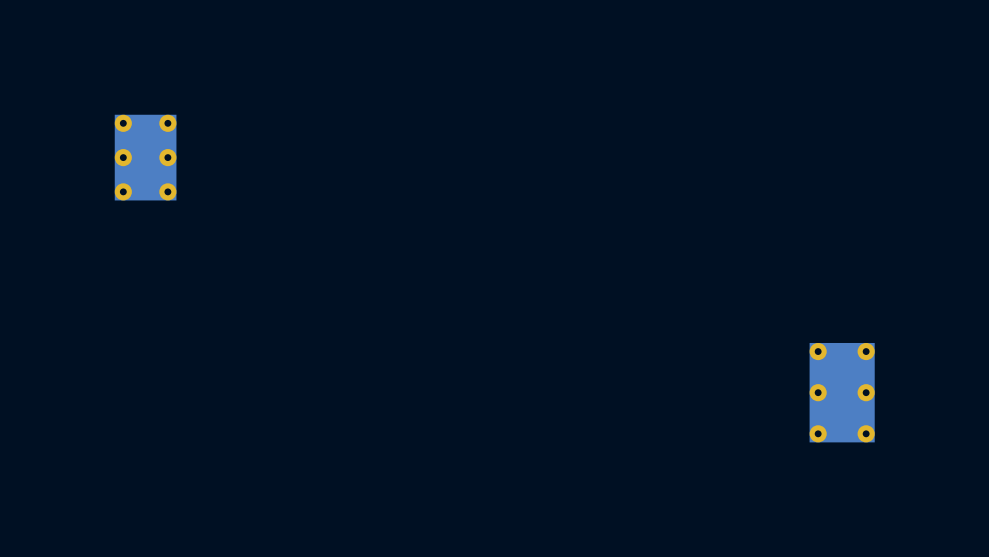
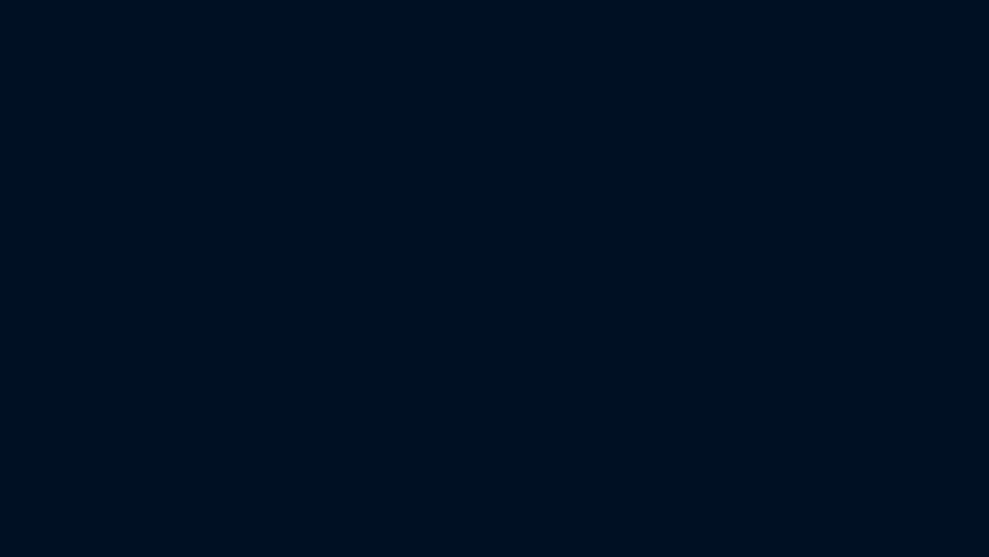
part: (145, 157) -> none
part: (842, 392) -> none

